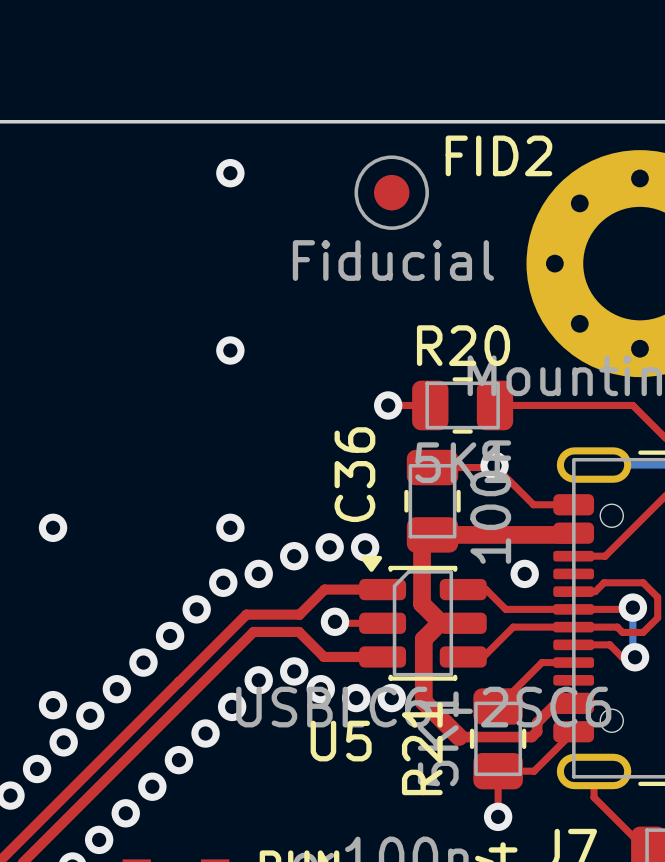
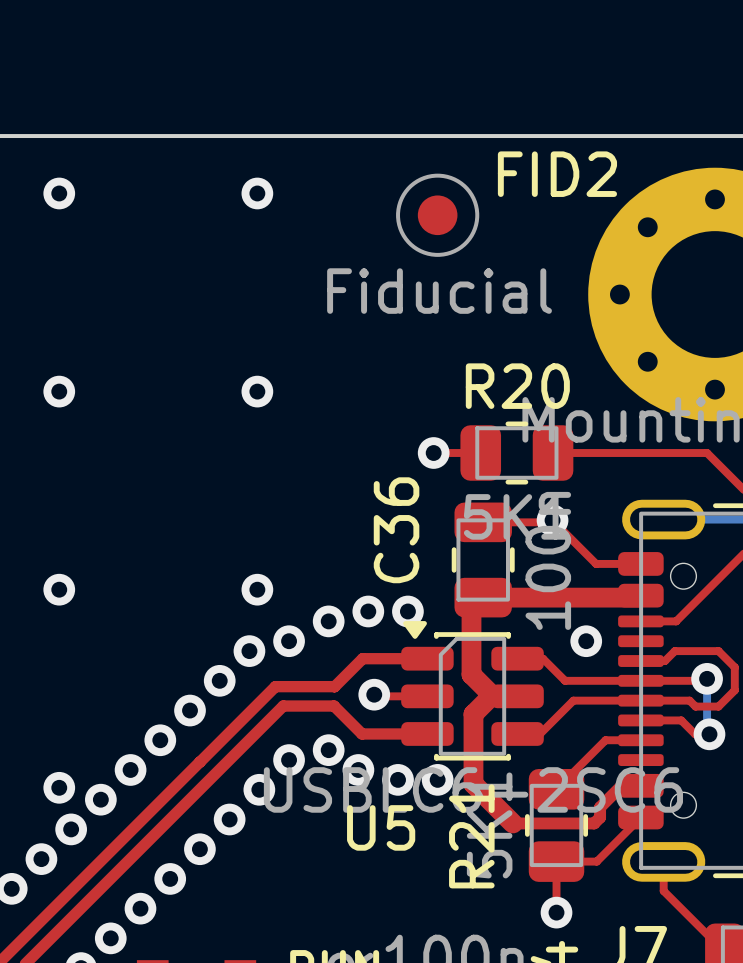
via: none -> (59, 193)
via: none -> (59, 391)

